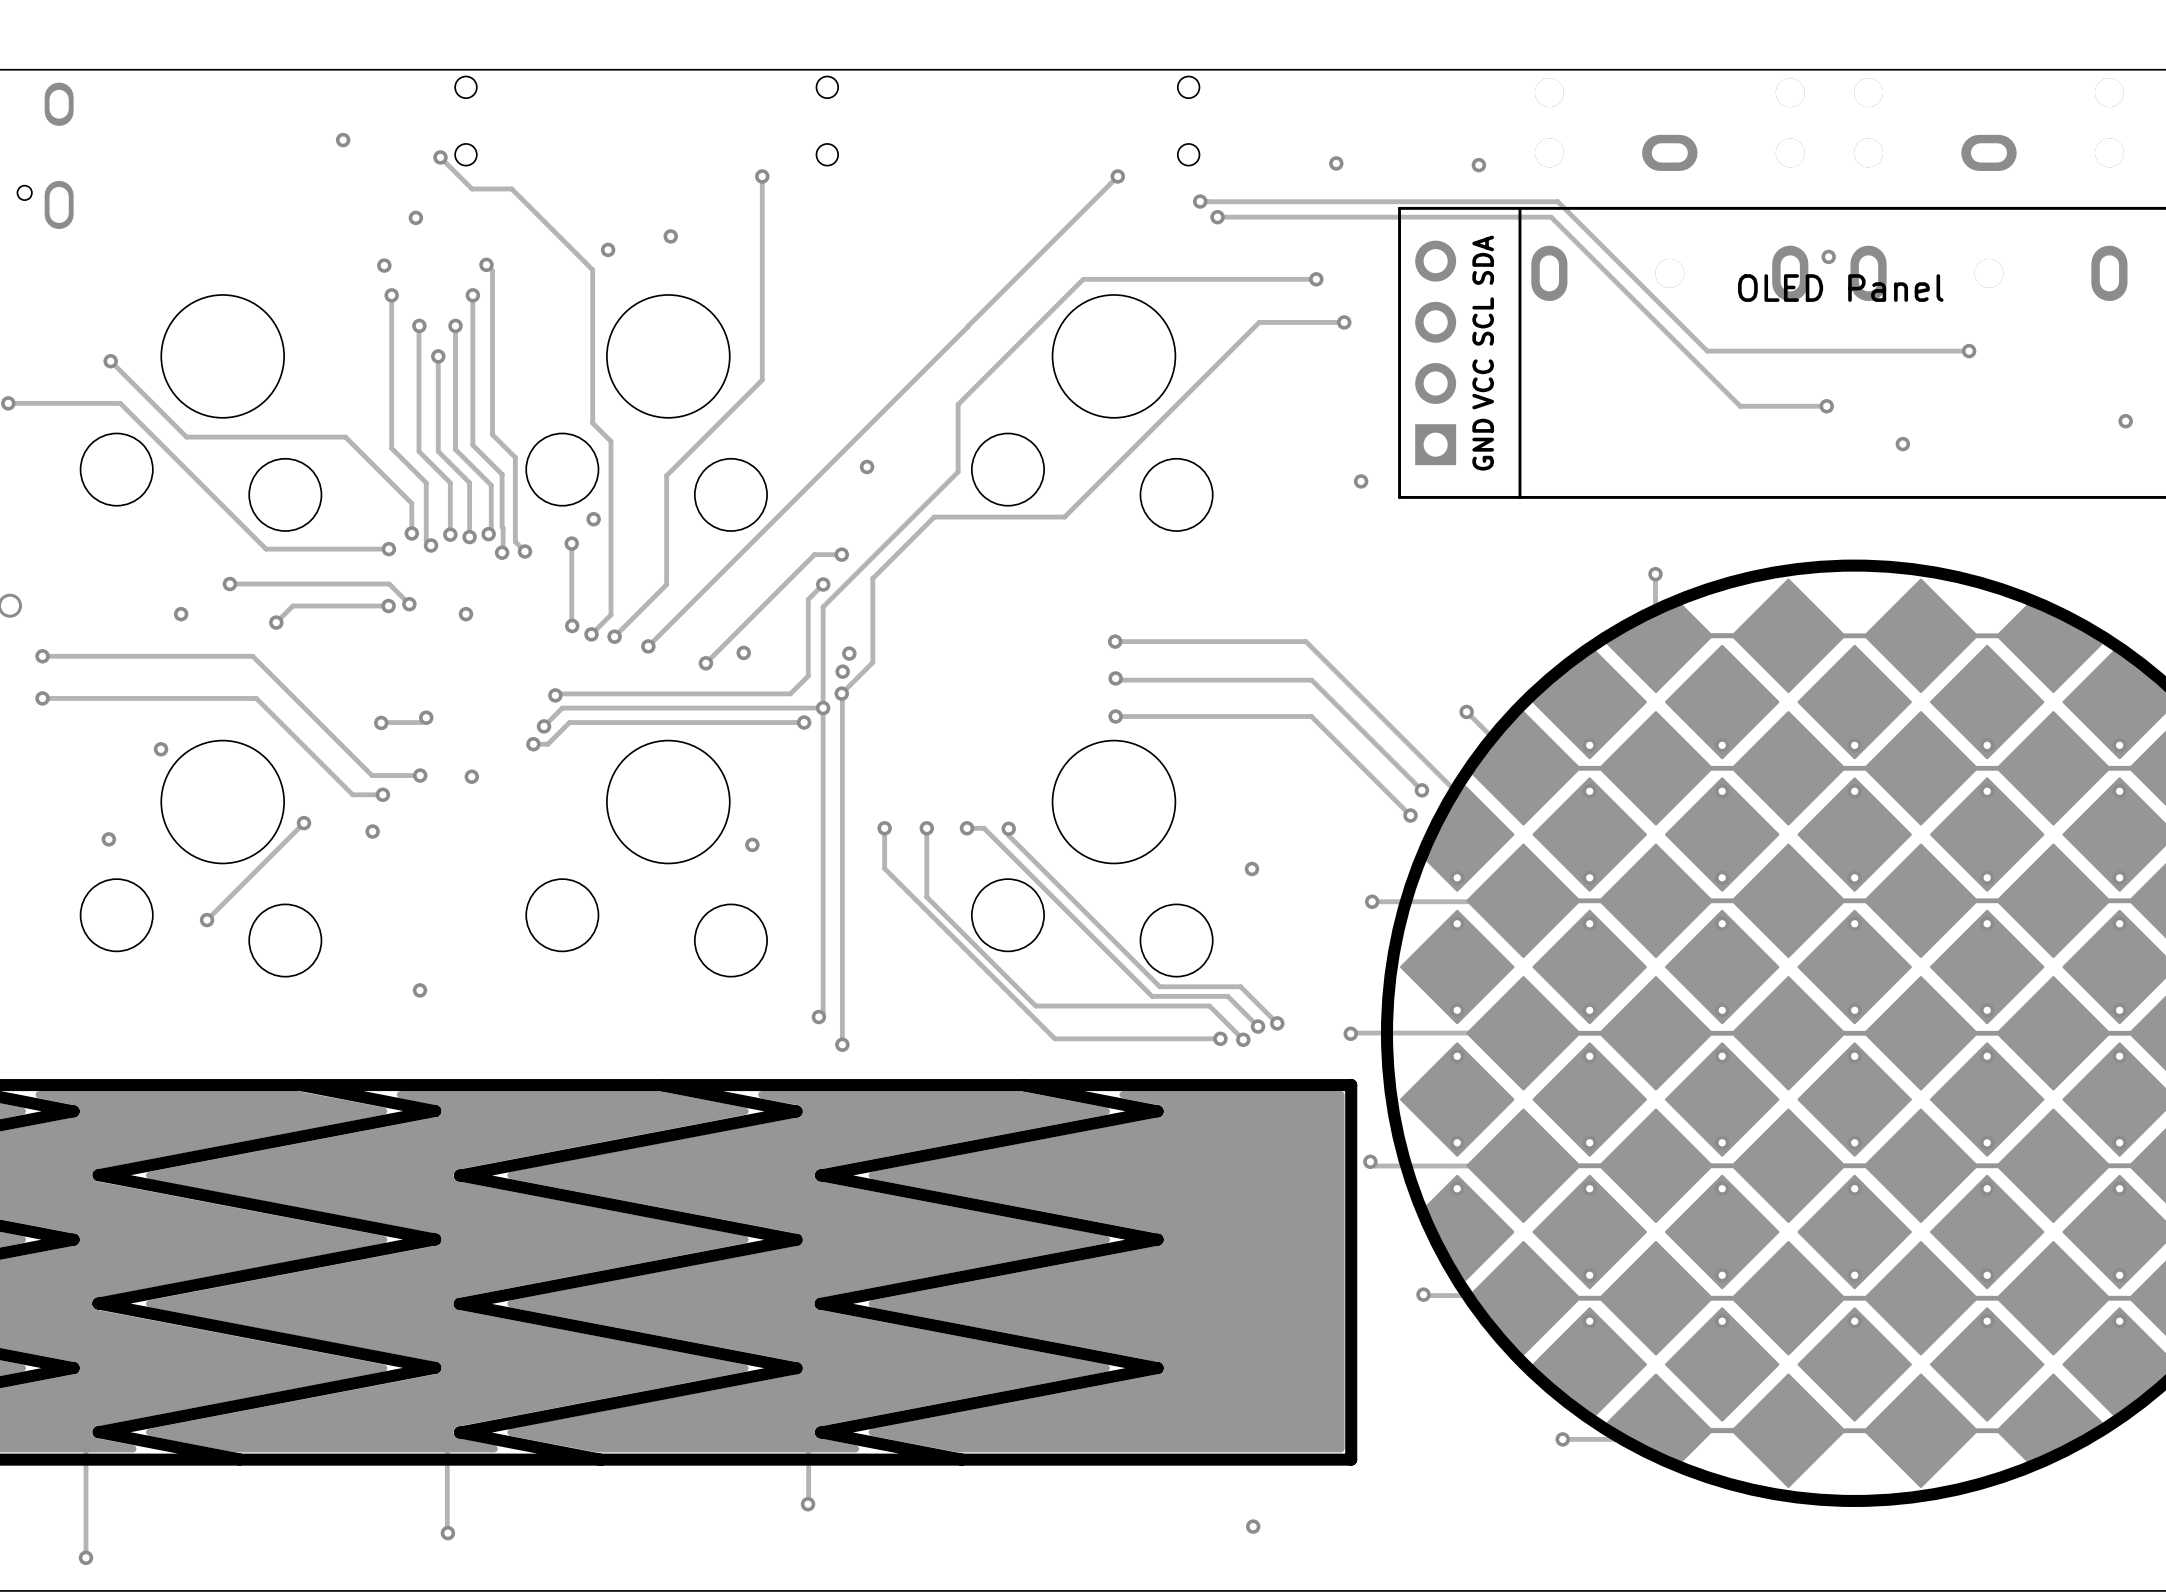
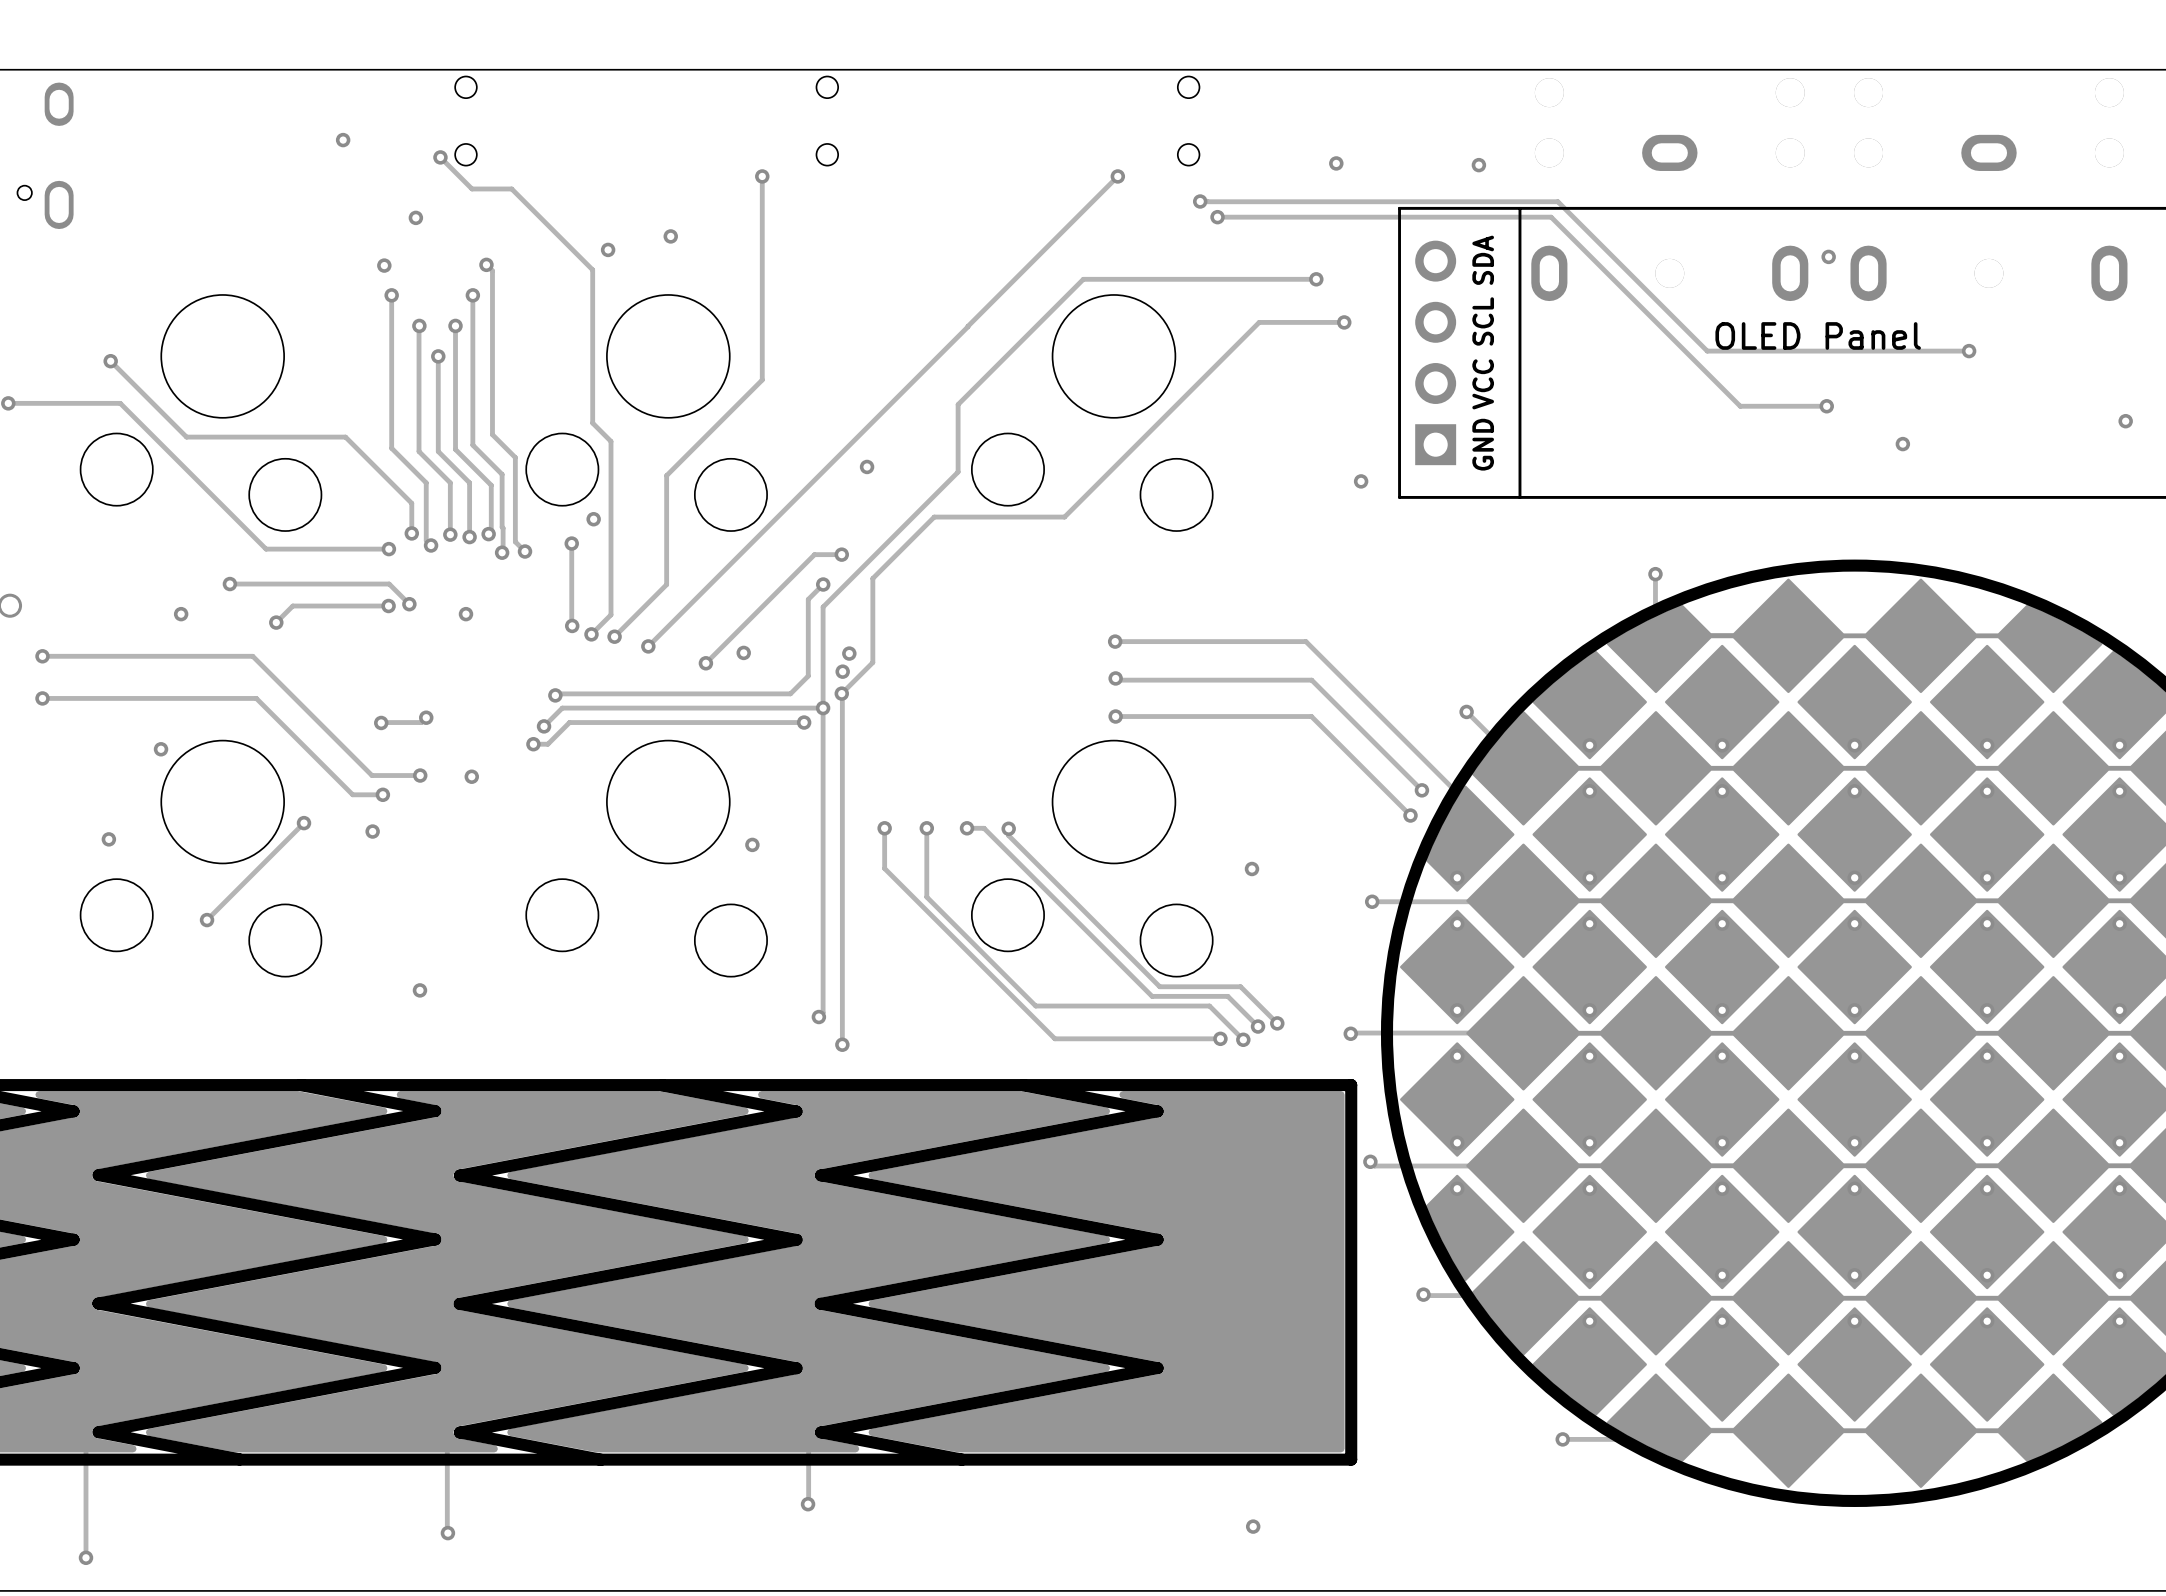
part text position: OLED Panel (1840, 288) -> OLED Panel (1818, 335)

